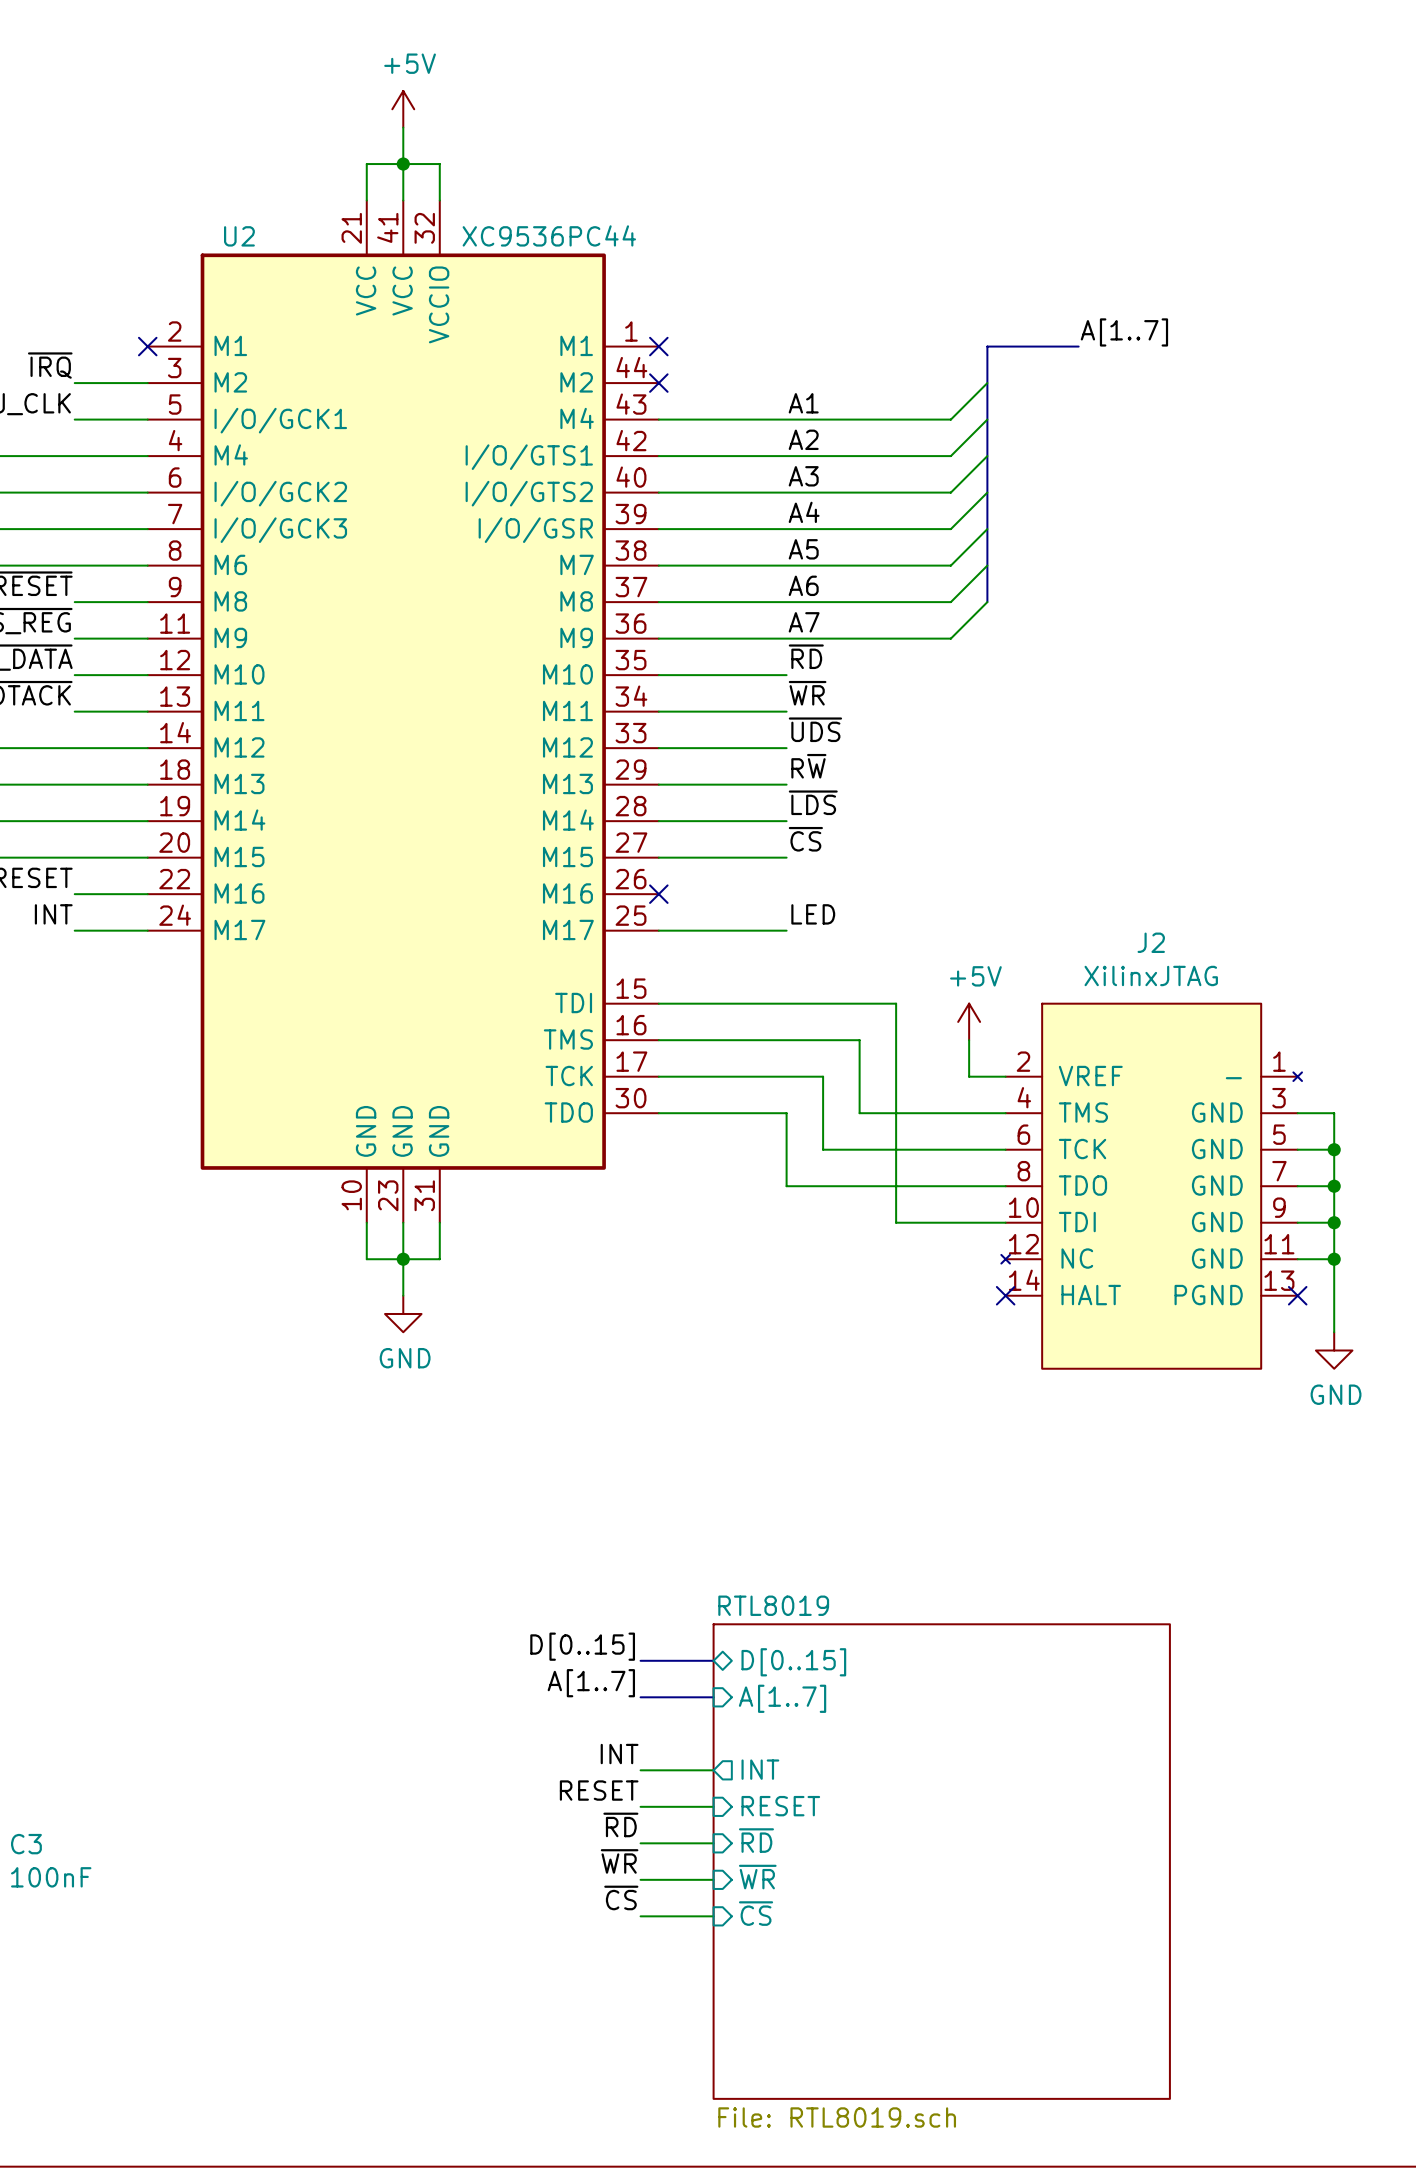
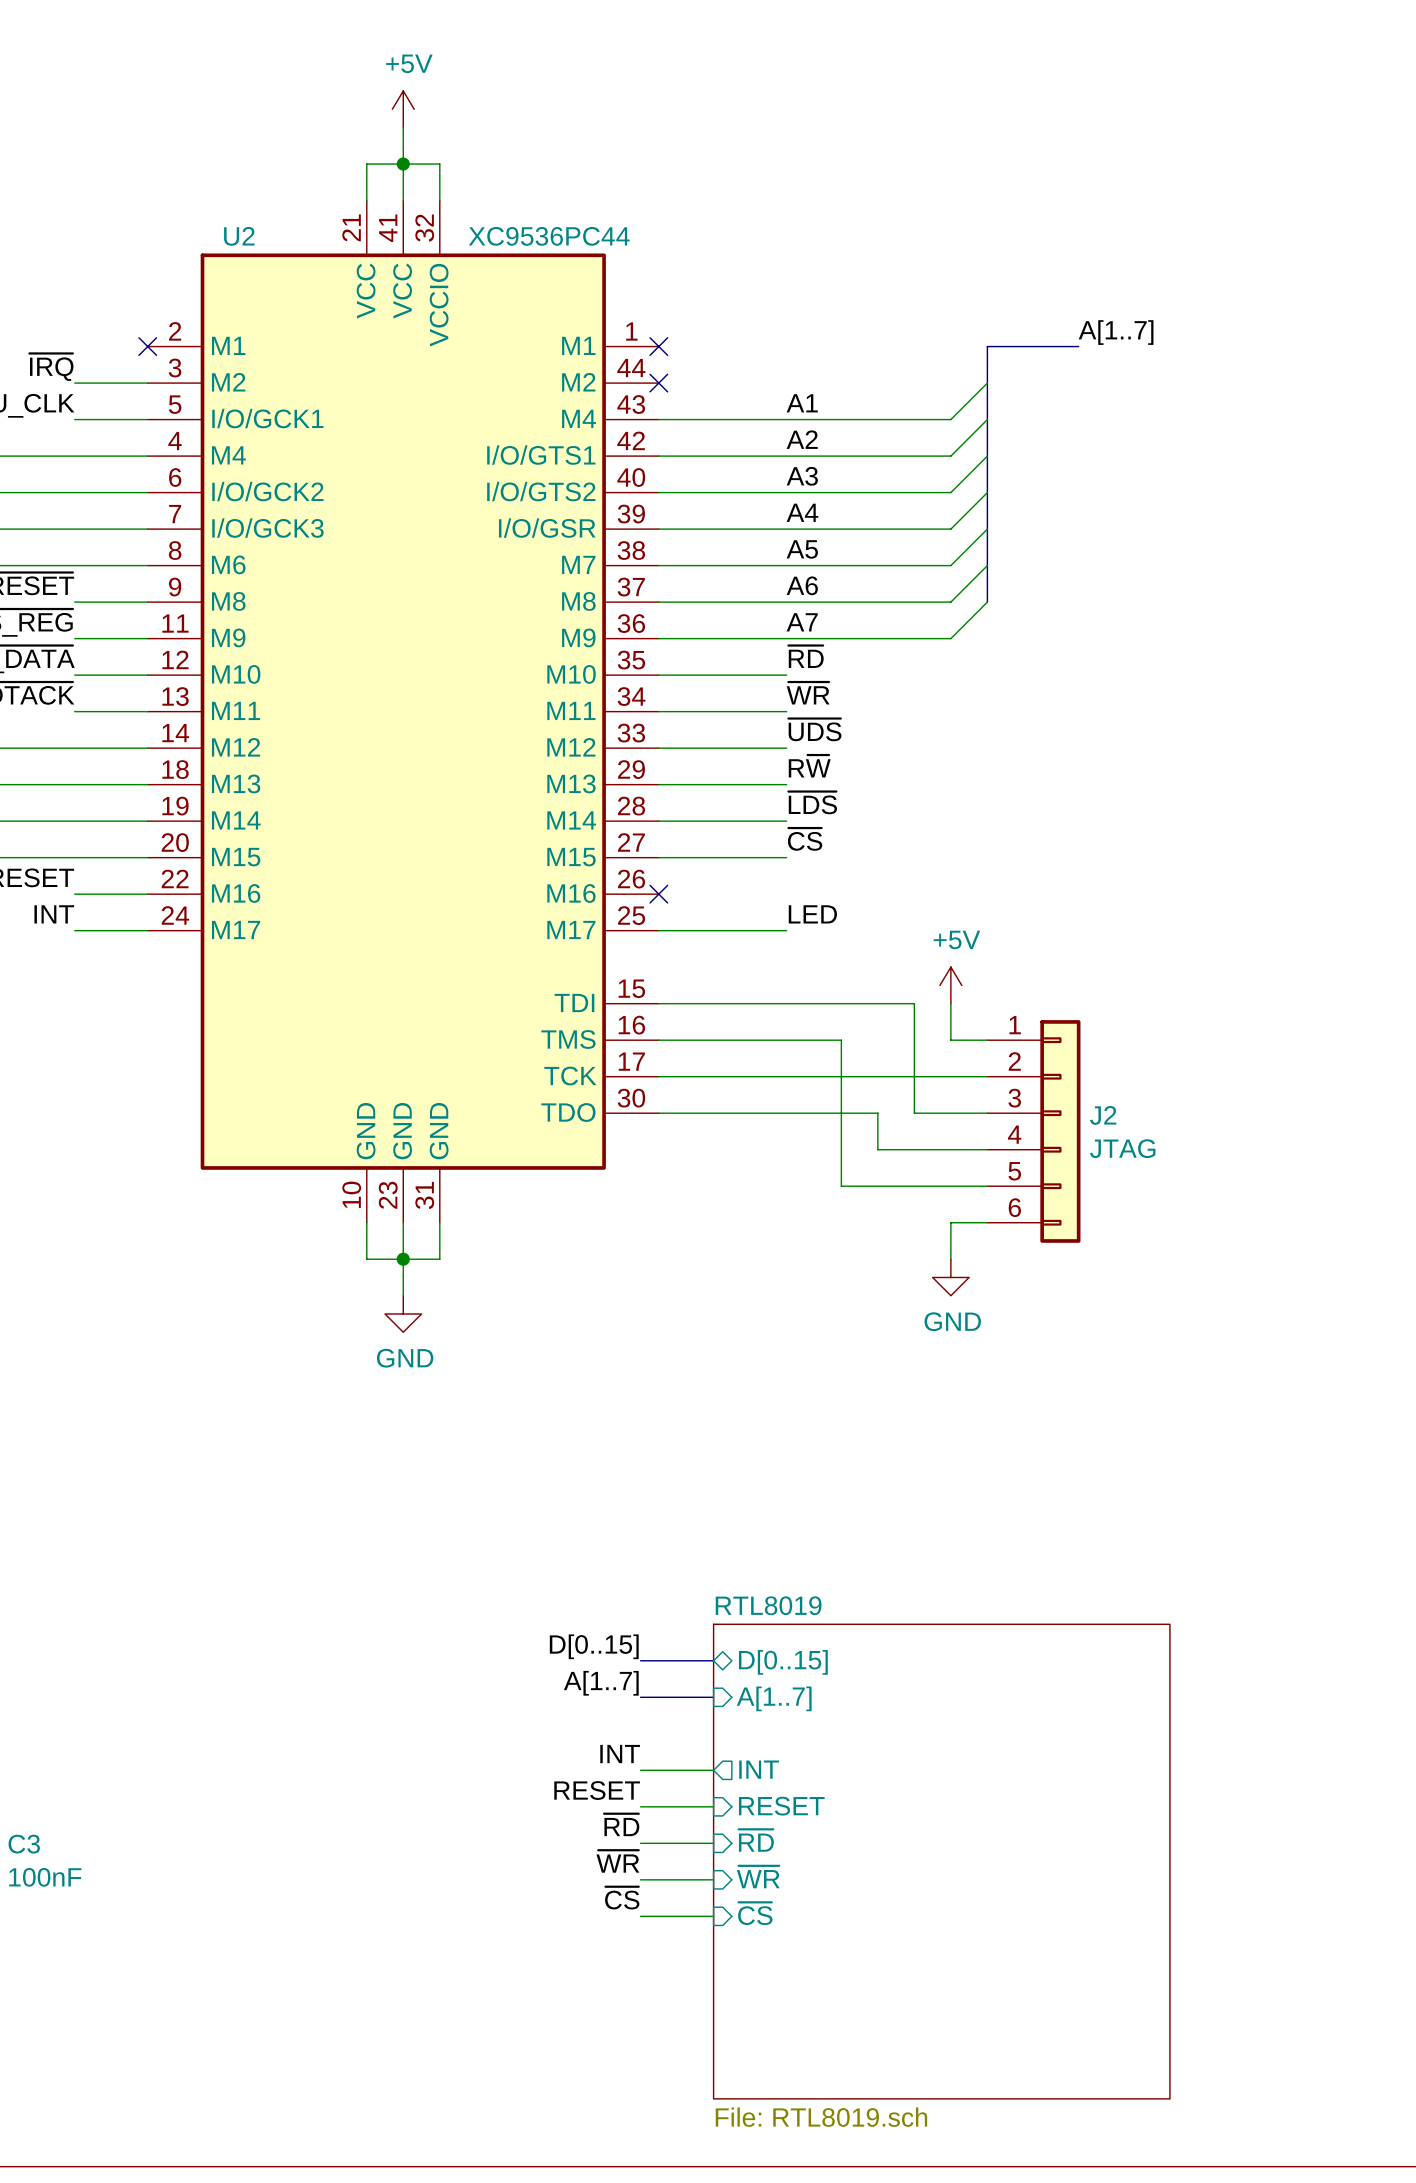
J2 name position: J2 (1151, 942) -> J2 (1103, 1115)
J2 value: XilinxJTAG (1151, 975) -> JTAG (1122, 1148)
wire: (896, 1003) (896, 1222) (950, 1222) -> (896, 1003) (914, 1003) (914, 1113)
wire: none -> (950, 1003) (950, 1040) (987, 1040)
J2 symbol: [1001, 1003, 1303, 1369] -> [987, 1020, 1081, 1243]
power symbol position: +5V (969, 1021) -> +5V (950, 985)
wire: (841, 1040) (859, 1040) (859, 1113) -> (841, 1040) (841, 1186)
wire: (969, 1040) (969, 1076) -> (950, 1222) (950, 1259)
wire: (823, 1076) (823, 1149) (877, 1149) -> (823, 1076) (969, 1076)
wire: (786, 1113) (786, 1186) (841, 1186) -> (786, 1113) (859, 1113)
wire: (877, 1113) (914, 1113) -> (877, 1113) (877, 1149)
wire: (1297, 1113) (1334, 1113) (1334, 1332) -> none
wire: (1297, 1149) (1334, 1149) -> none
junction: (1334, 1149) -> none
wire: (1297, 1186) (1334, 1186) -> none
junction: (1334, 1186) -> none
wire: (1297, 1222) (1334, 1222) -> none
junction: (1334, 1222) -> none
wire: (1297, 1259) (1334, 1259) -> none
junction: (1334, 1259) -> none
power symbol: none -> GND (950, 1277)
no-connect mark: (1005, 1295) -> none
no-connect mark: (1297, 1295) -> none
power symbol: GND (1334, 1350) -> none

